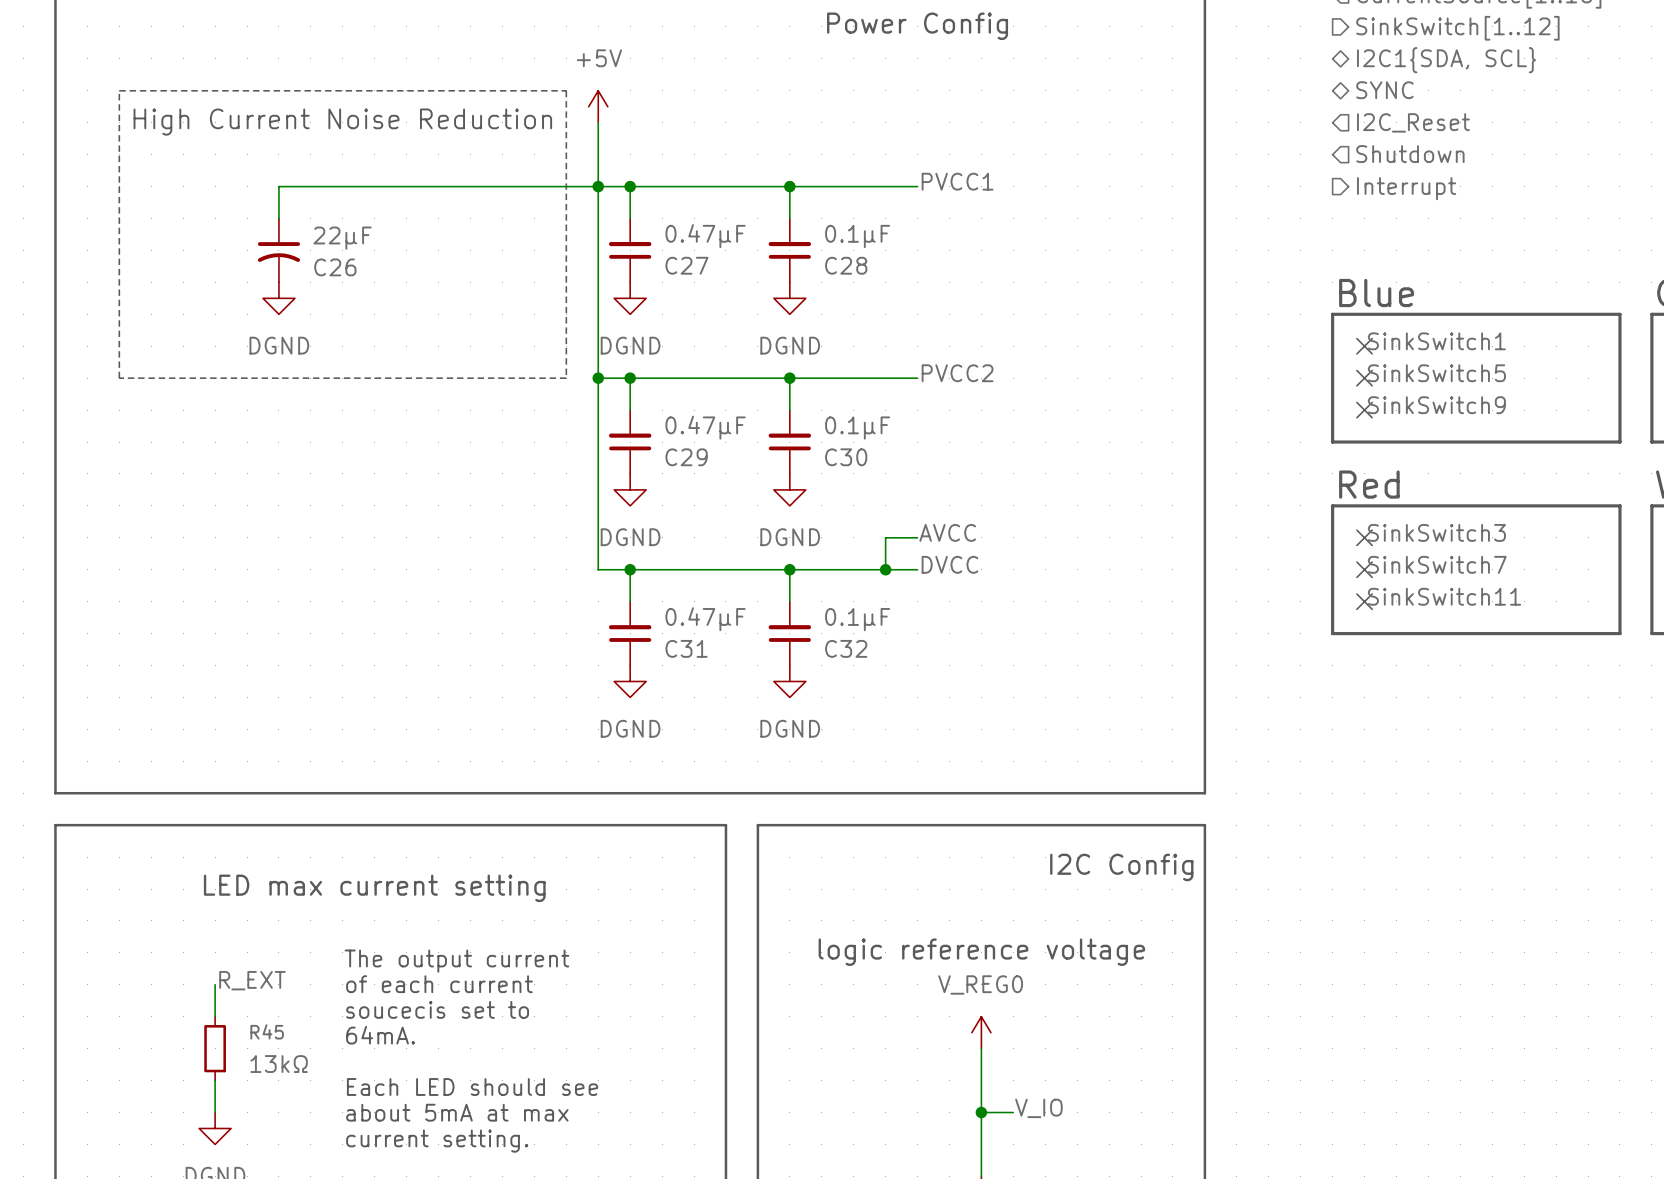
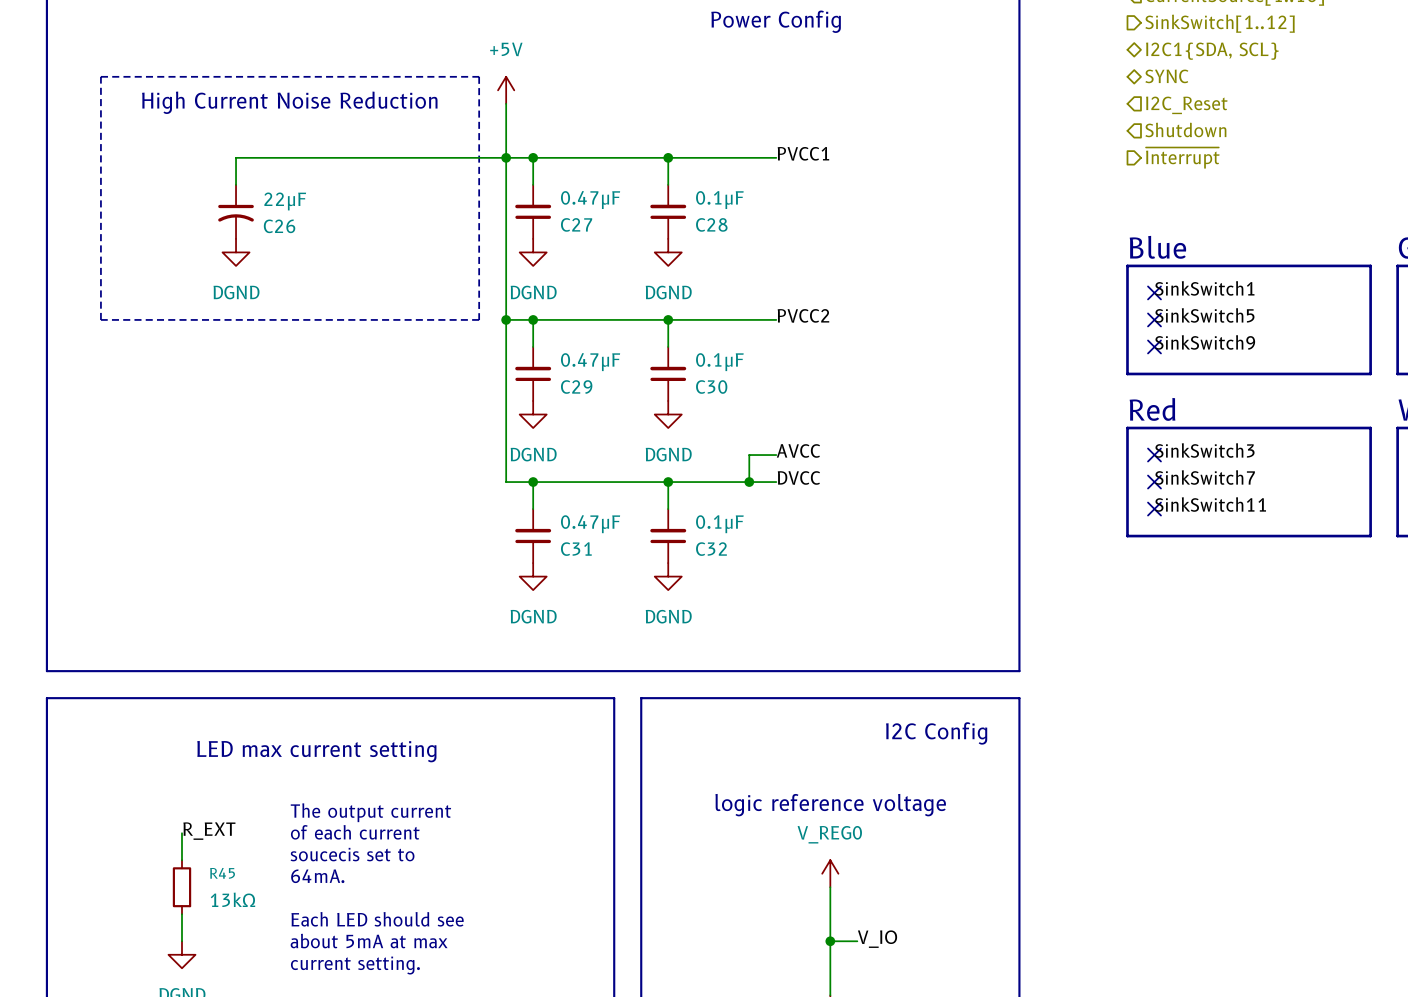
hierarchical label: Interrupt (1406, 188) -> ~{Interrupt} (1182, 158)

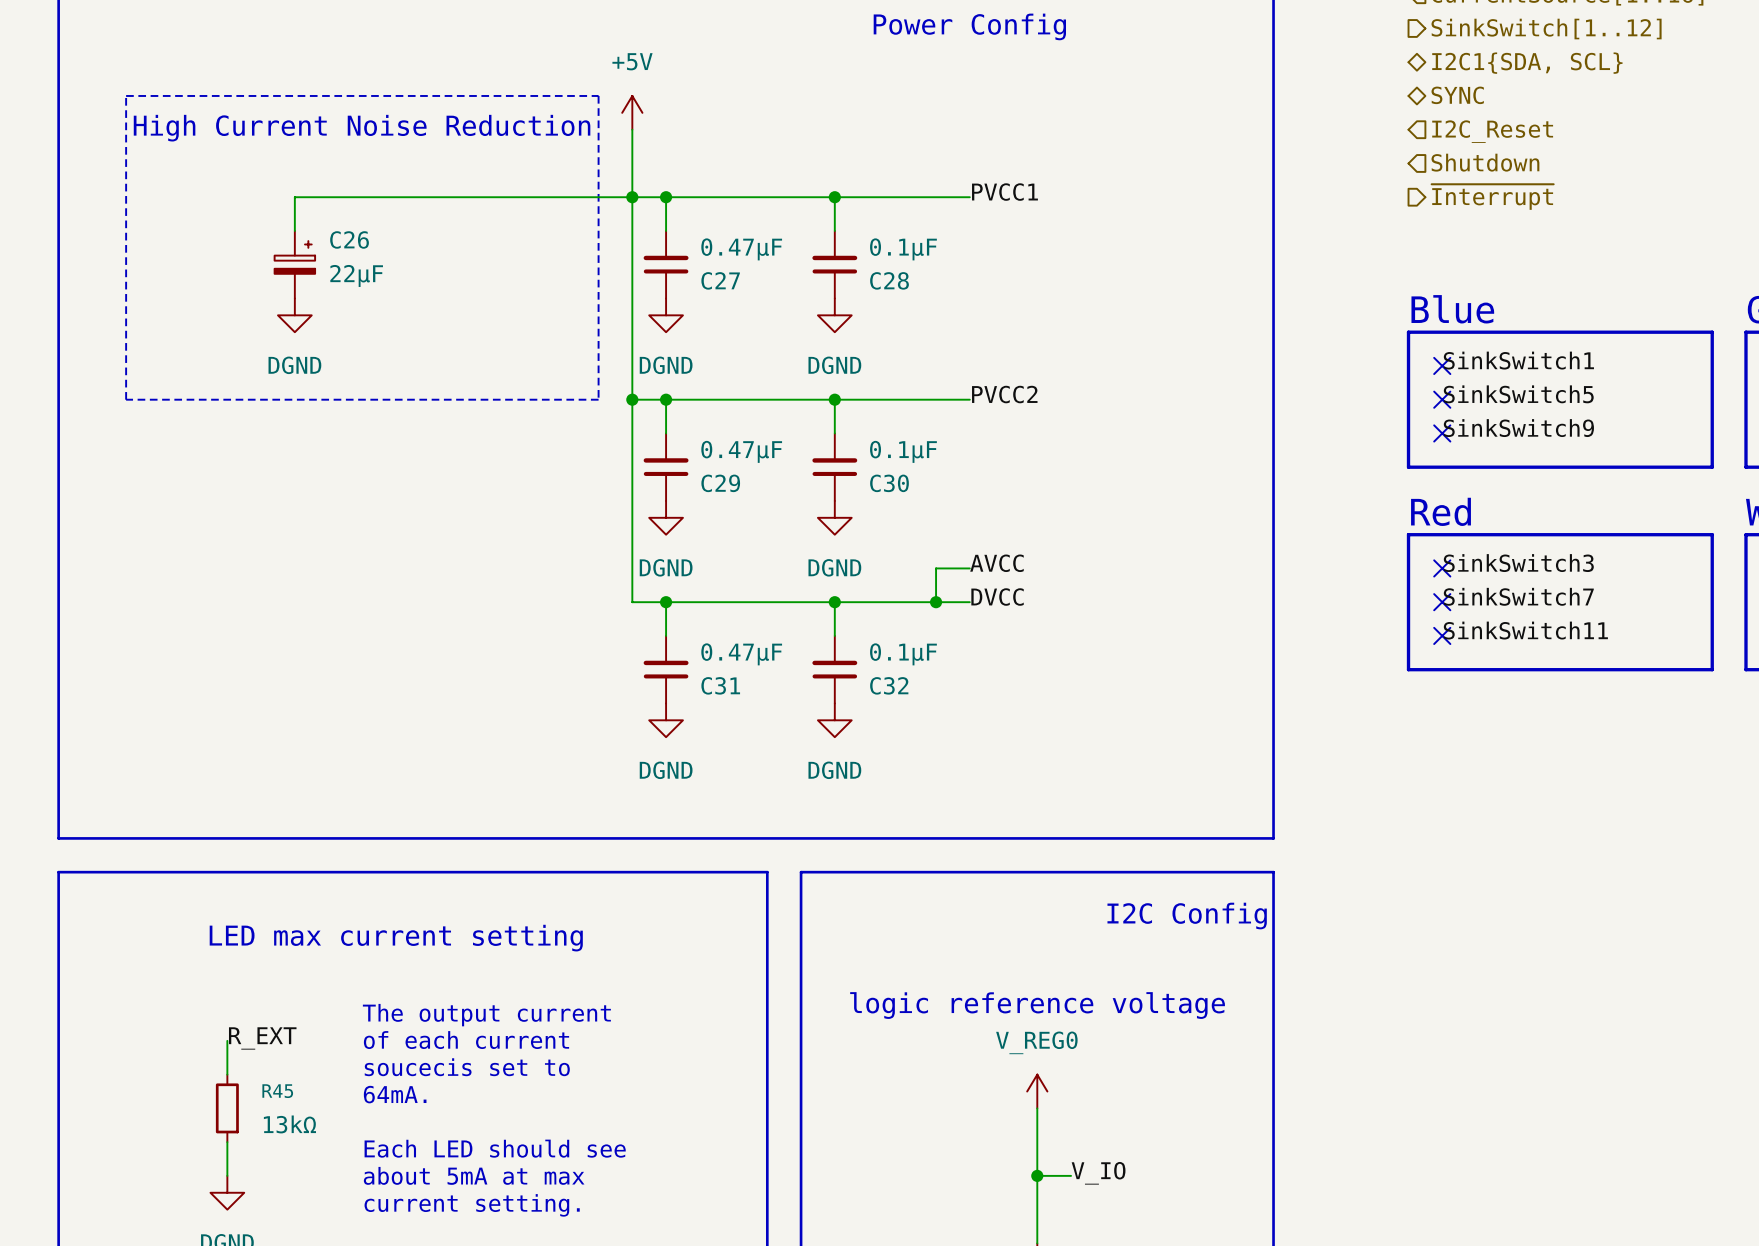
C26 symbol: [218, 184, 254, 239] -> [274, 230, 316, 299]
C26 name position: C26 (279, 226) -> C26 (349, 239)

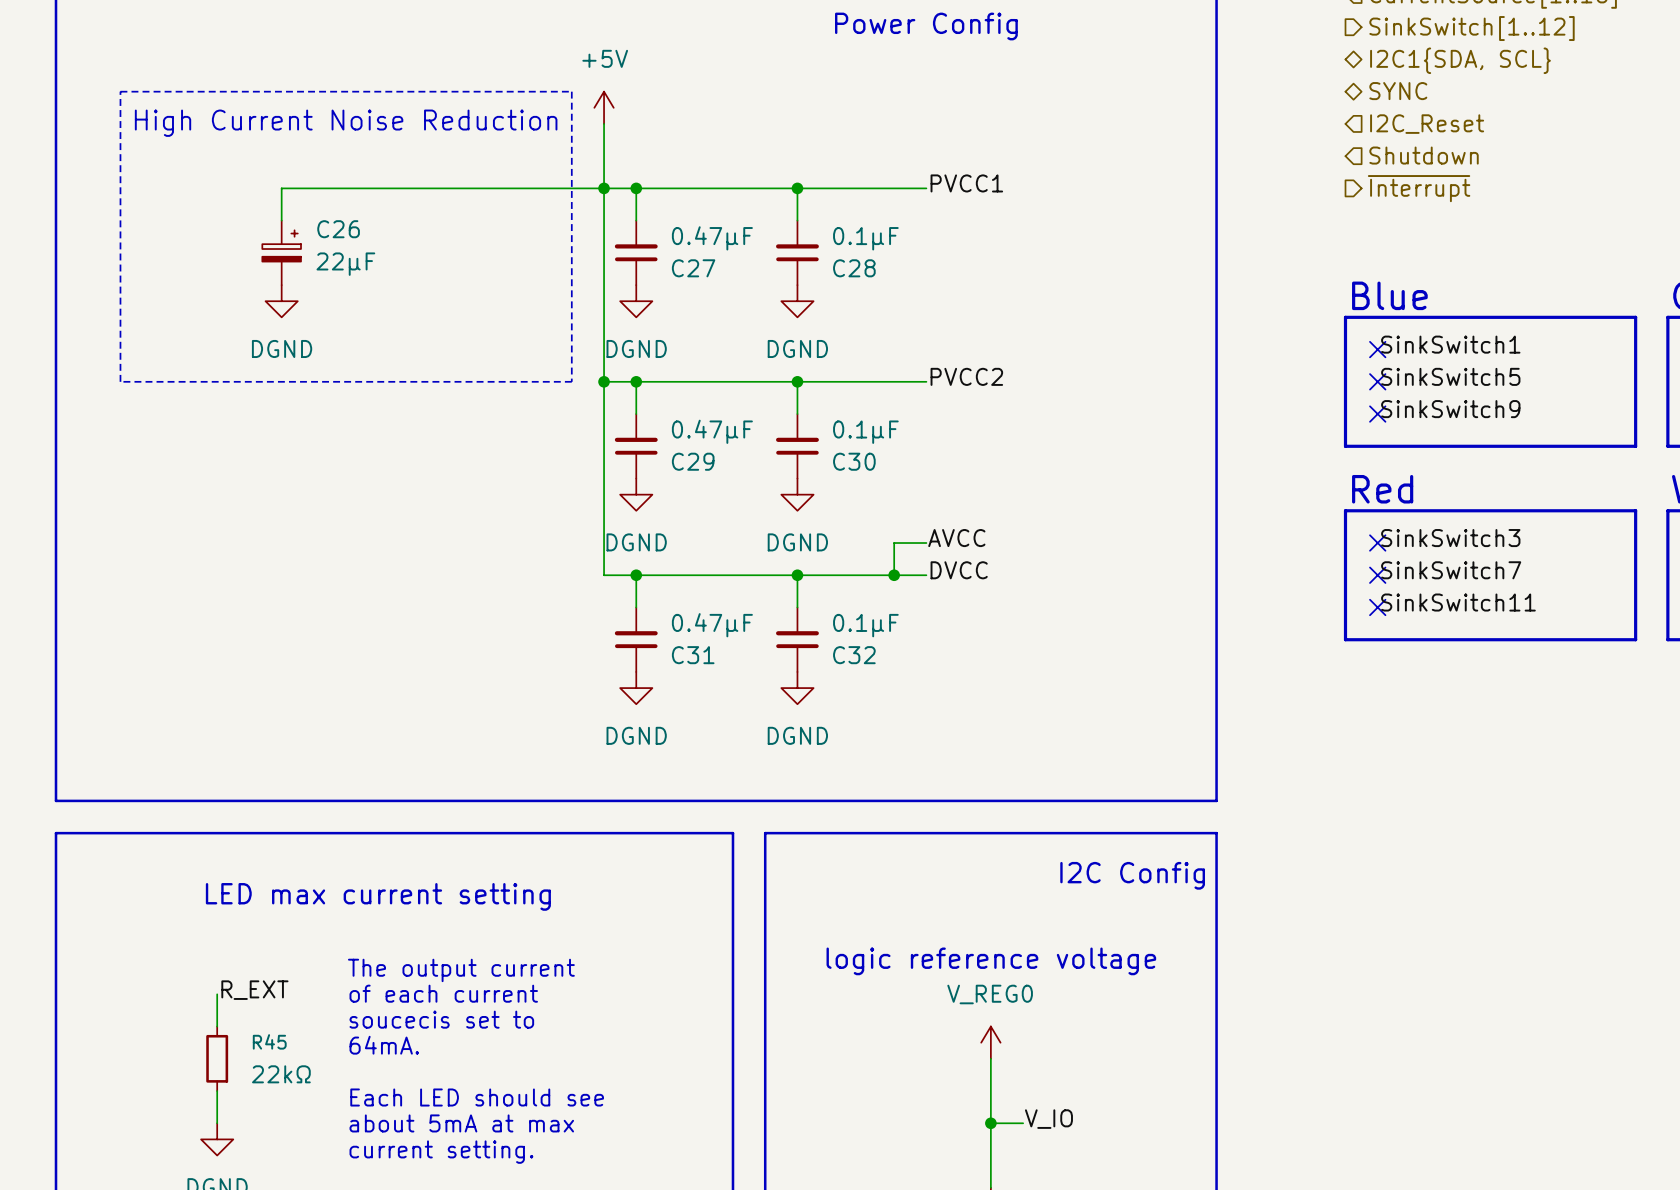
R45 value: 13kΩ (289, 1124) -> 22kΩ (281, 1074)

